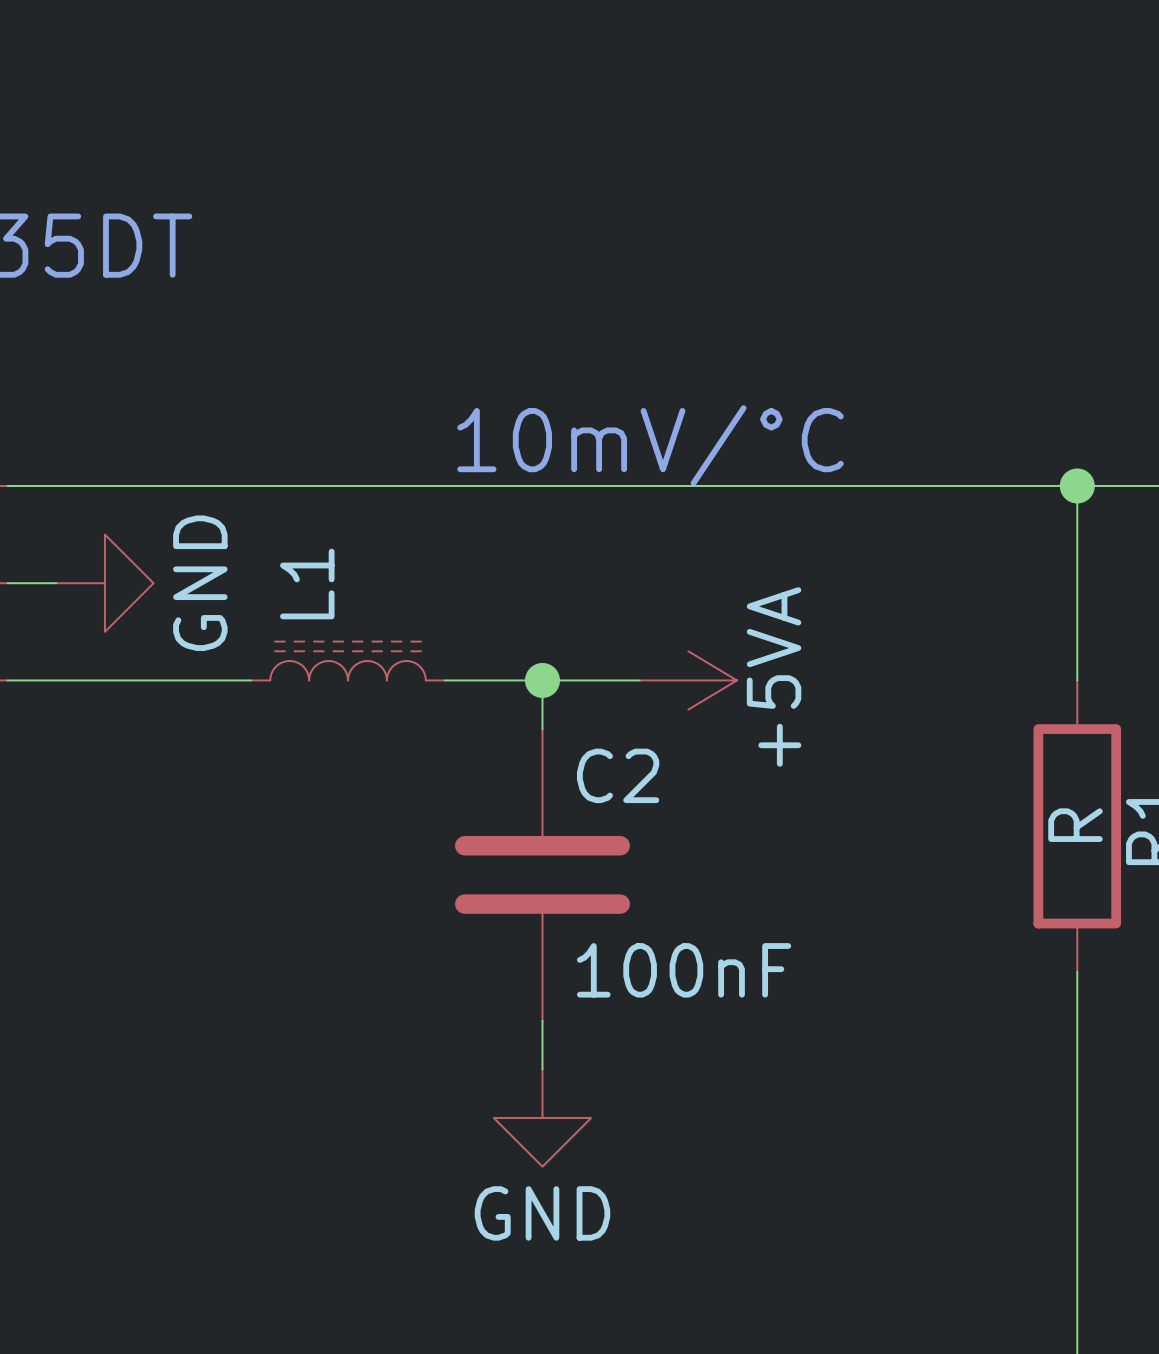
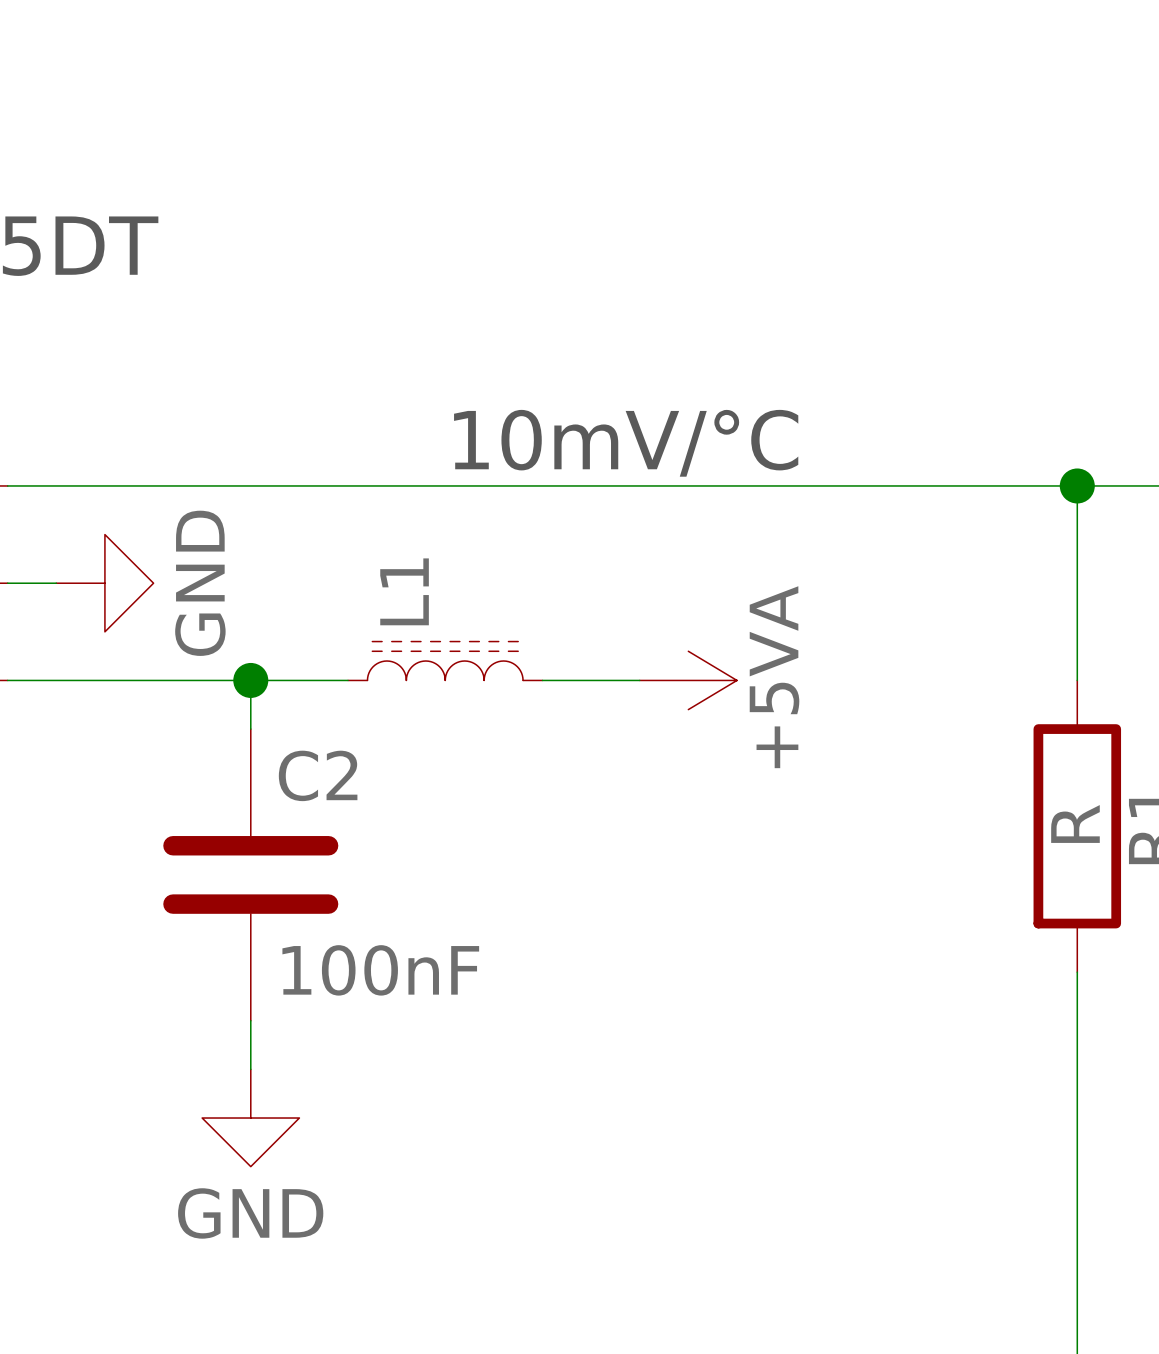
L1 position: (348, 661) -> (445, 661)
junction: none -> (250, 680)
wire: none -> (348, 680) (250, 680) (250, 729)
wire: (445, 680) (542, 680) (542, 729) -> none
junction: (542, 680) -> none
C2 position: (542, 874) -> (250, 874)
wire: (542, 1020) (542, 1069) -> (250, 1020) (250, 1069)
power symbol position: GND (542, 1118) -> GND (250, 1118)

